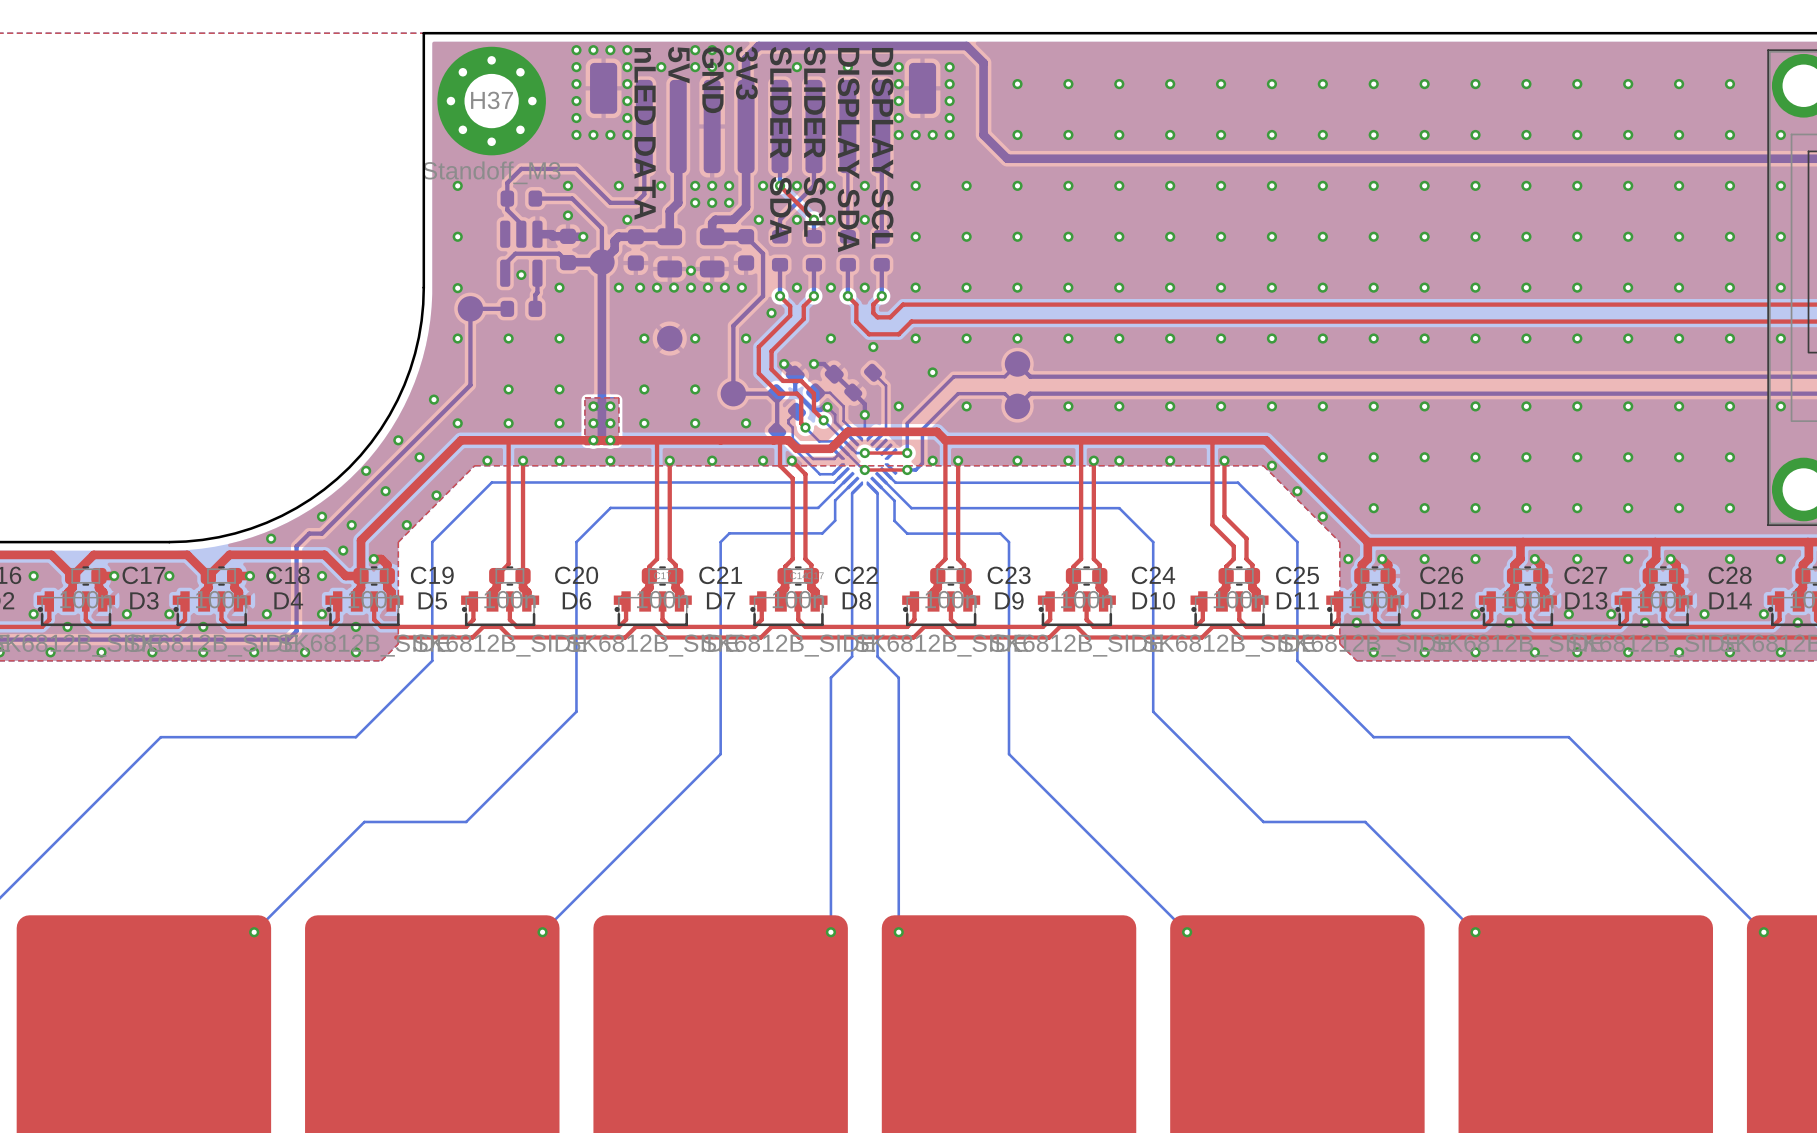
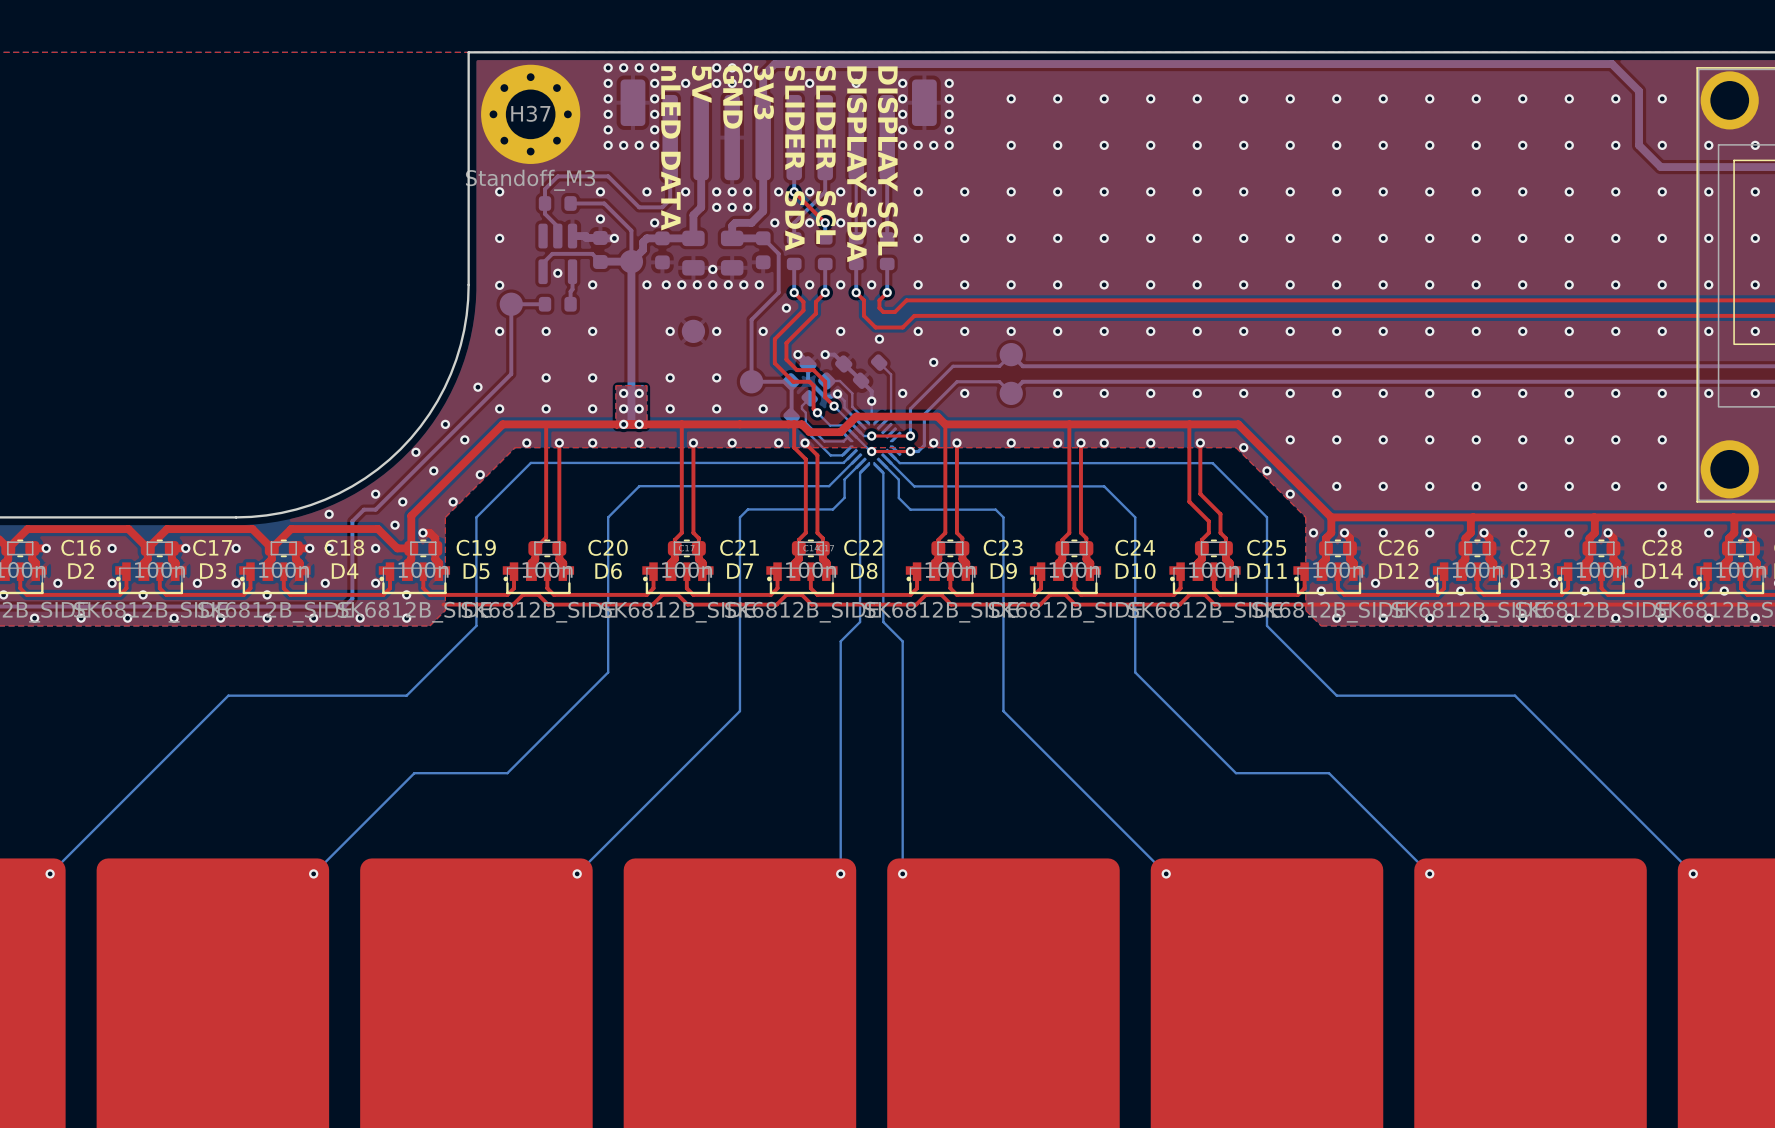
bottom track: (966, 46) (983, 62) (983, 134) (1007, 158) (1728, 158) -> (964, 64) (1611, 64) (1639, 91) (1639, 145) (1660, 167)

